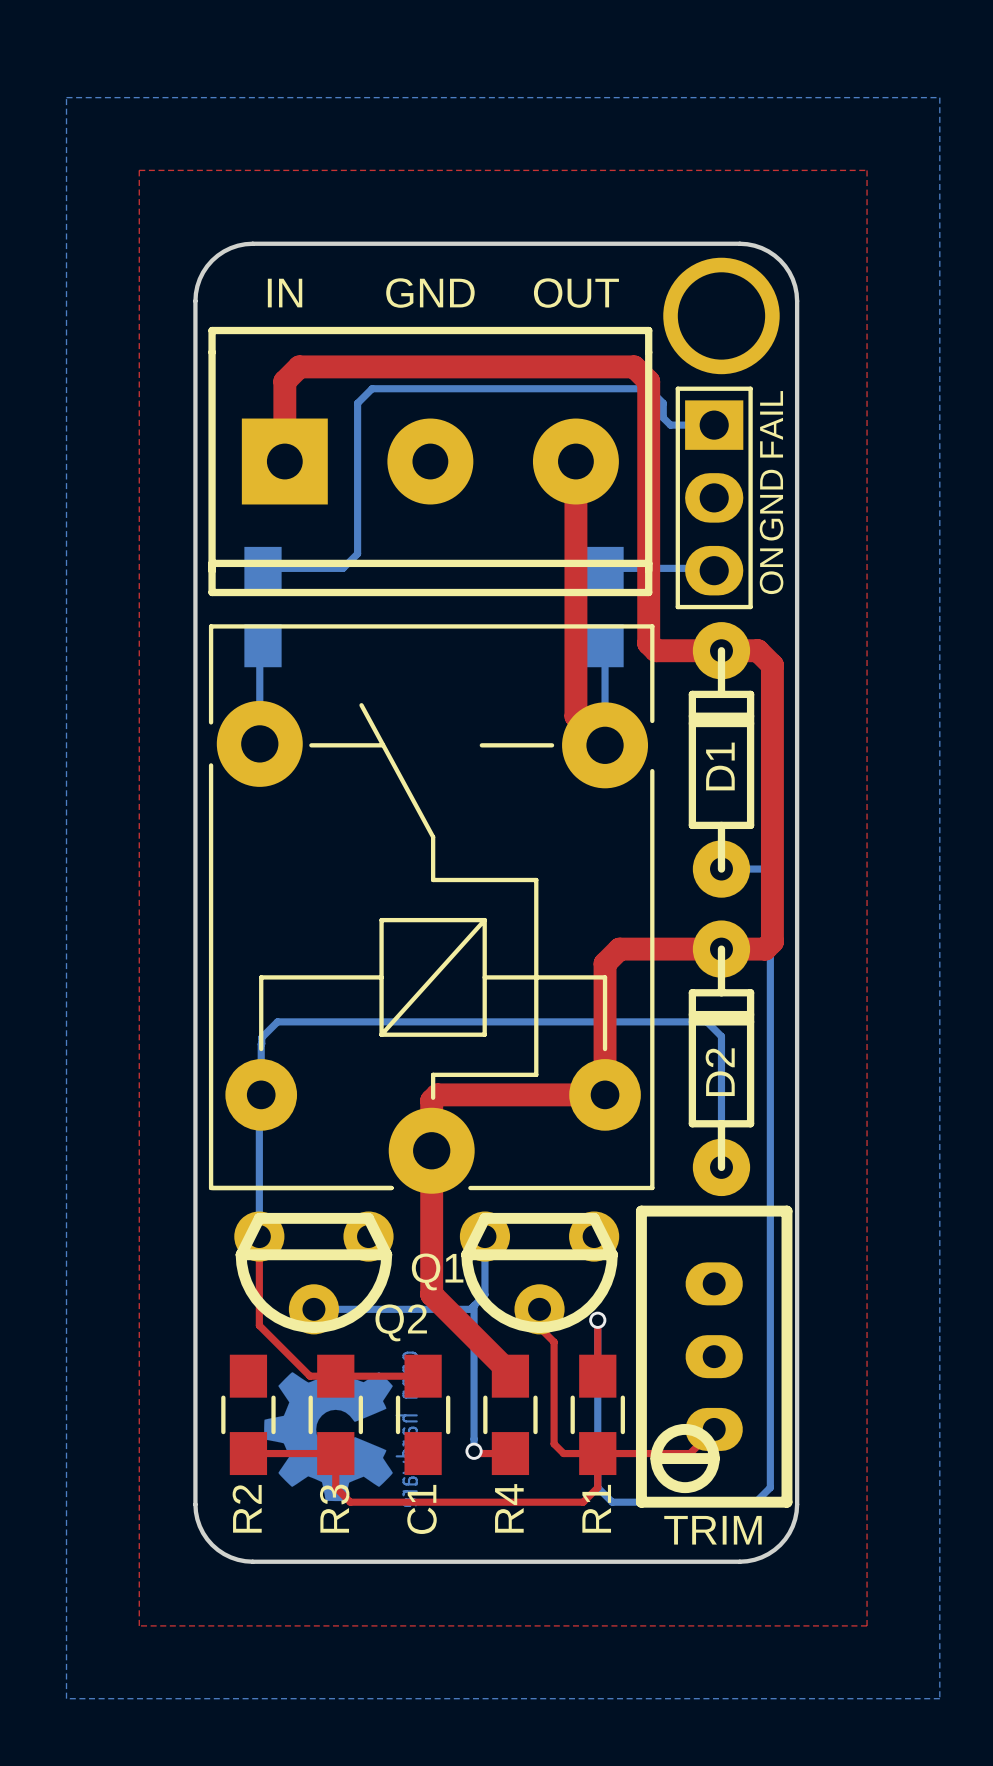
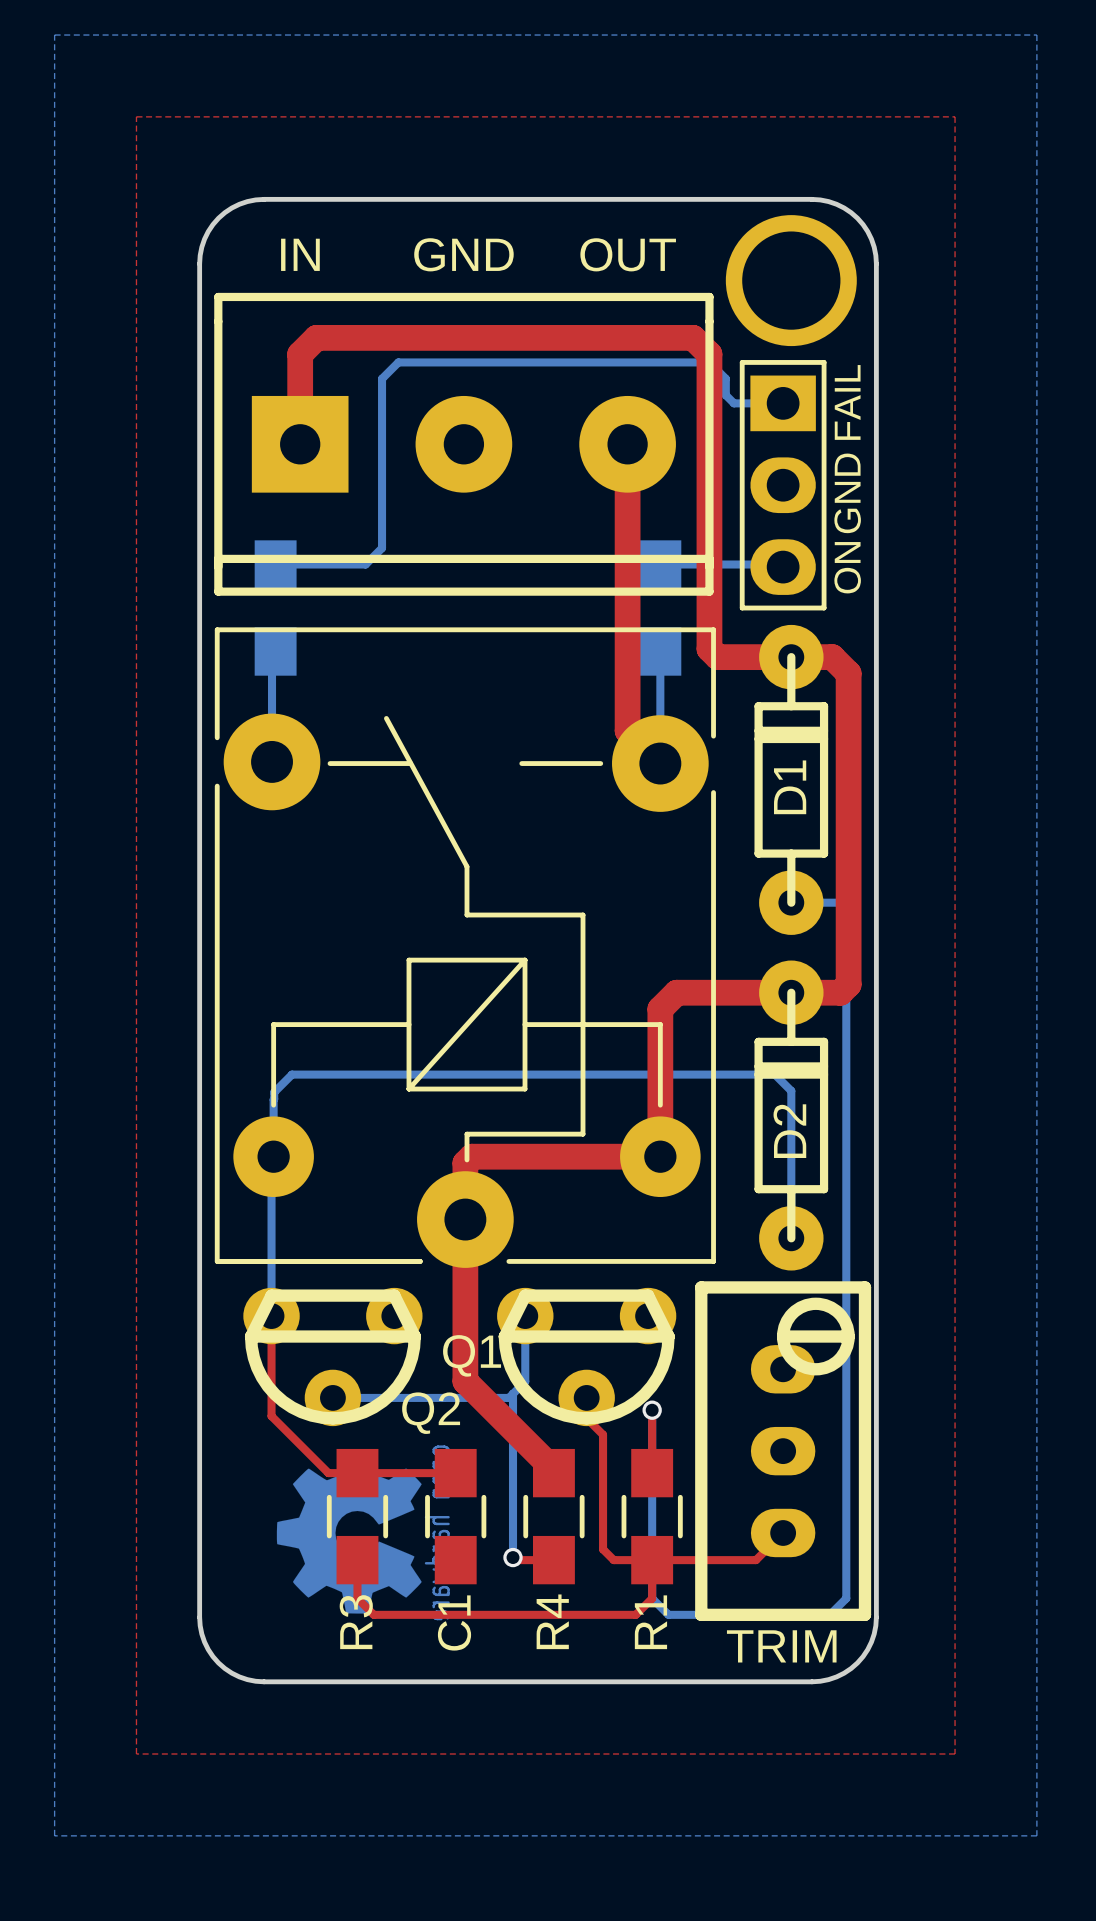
part rotation: 0° (714, 1356) -> 180° (783, 1451)
R2: (248, 1414) -> none
top track: (248, 1453) (335, 1453) -> none

